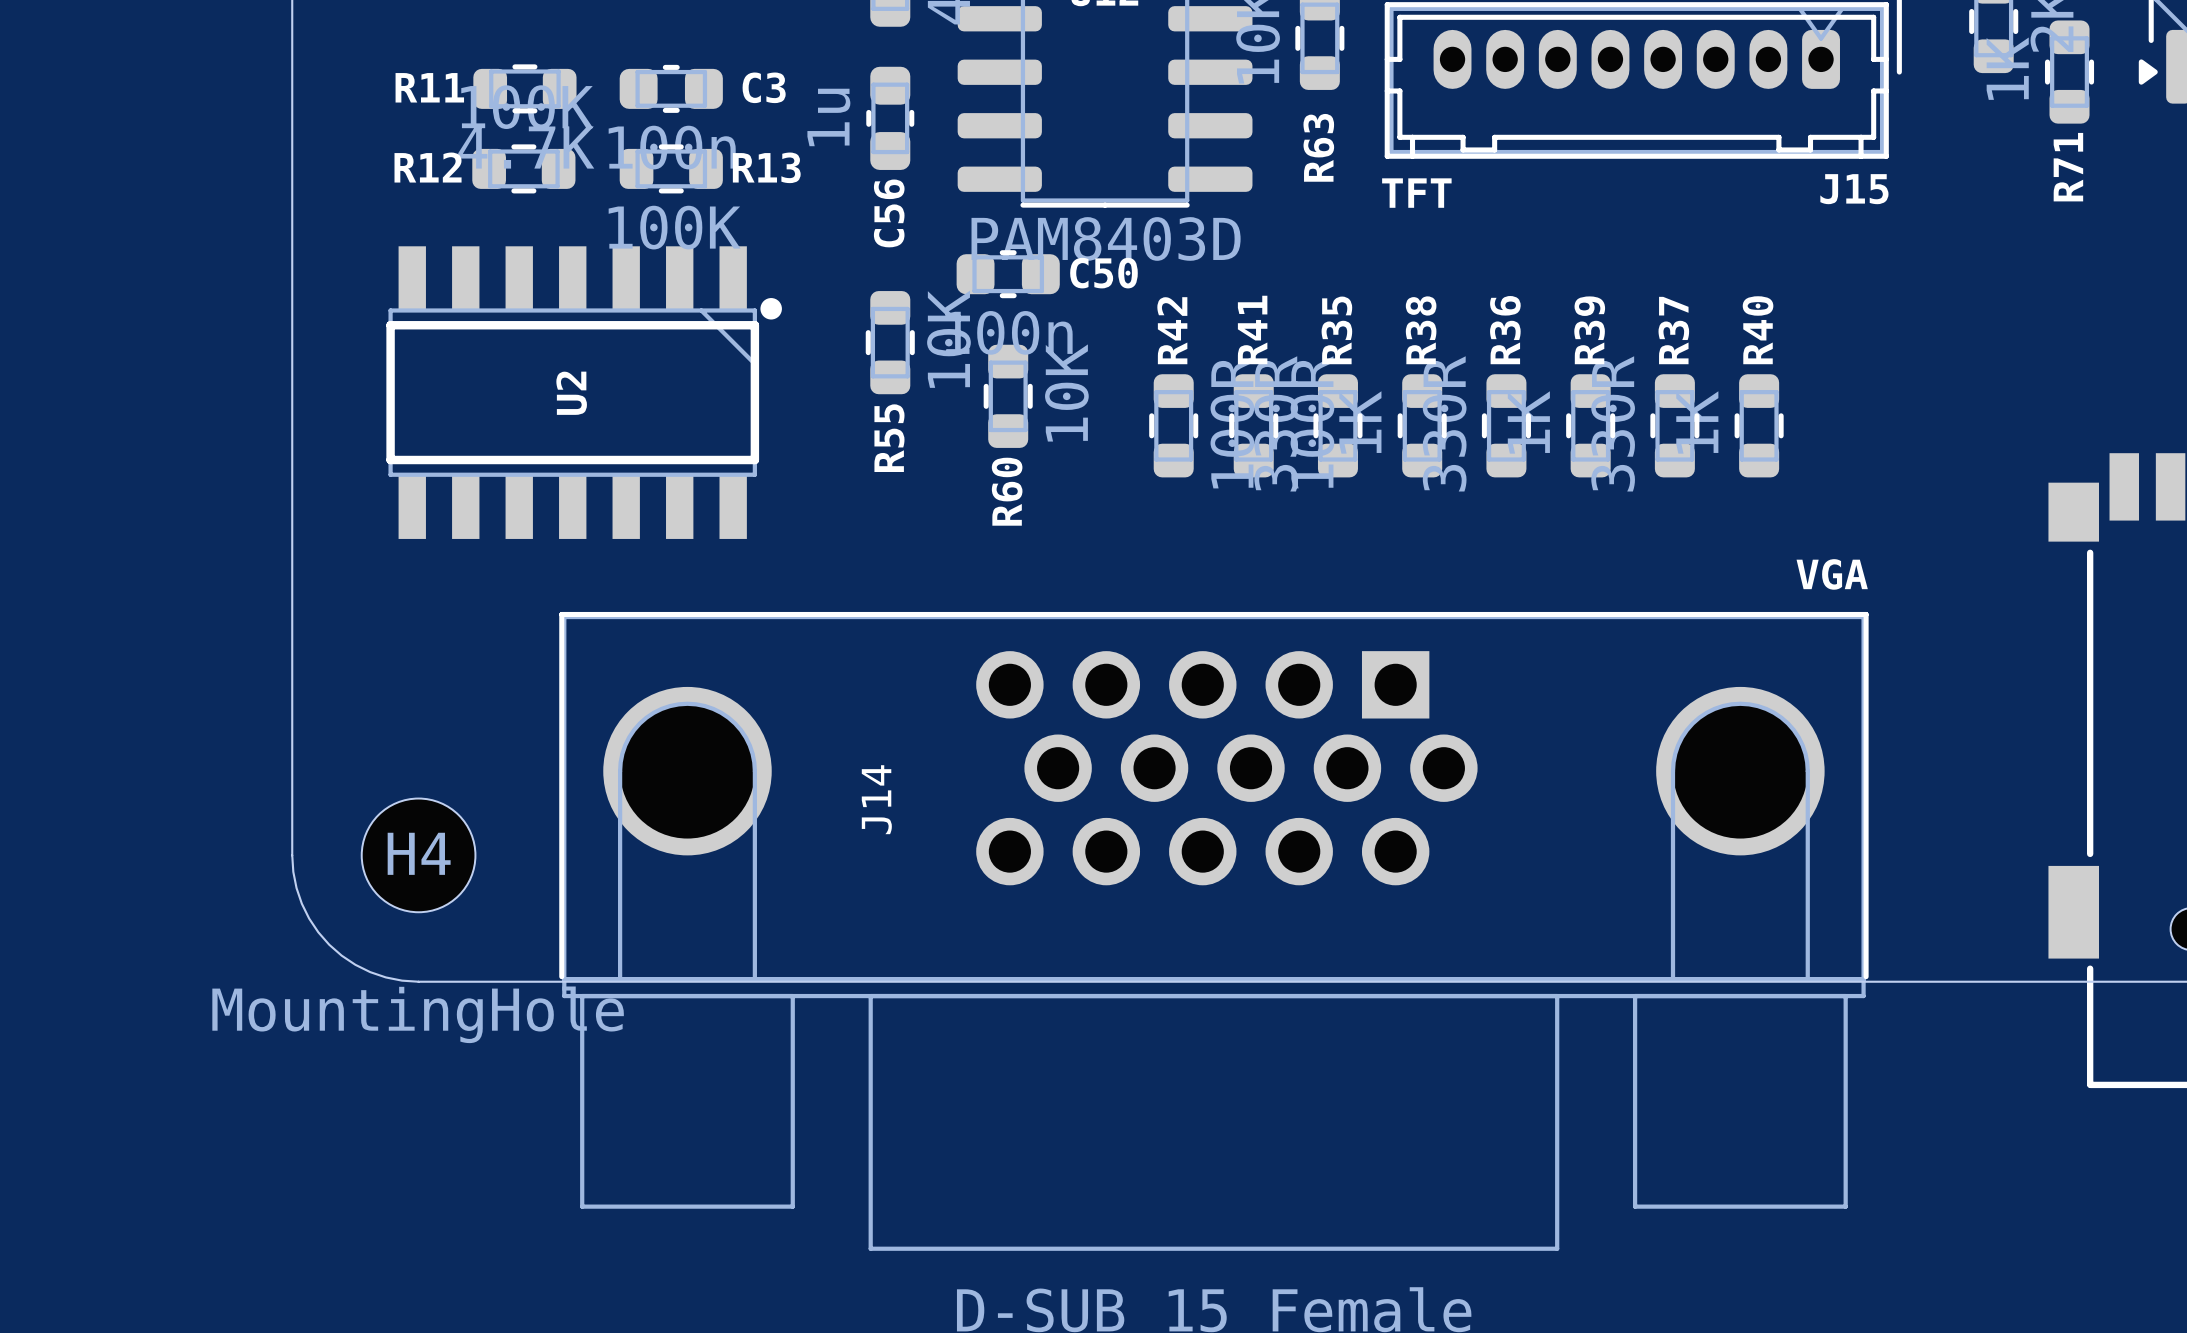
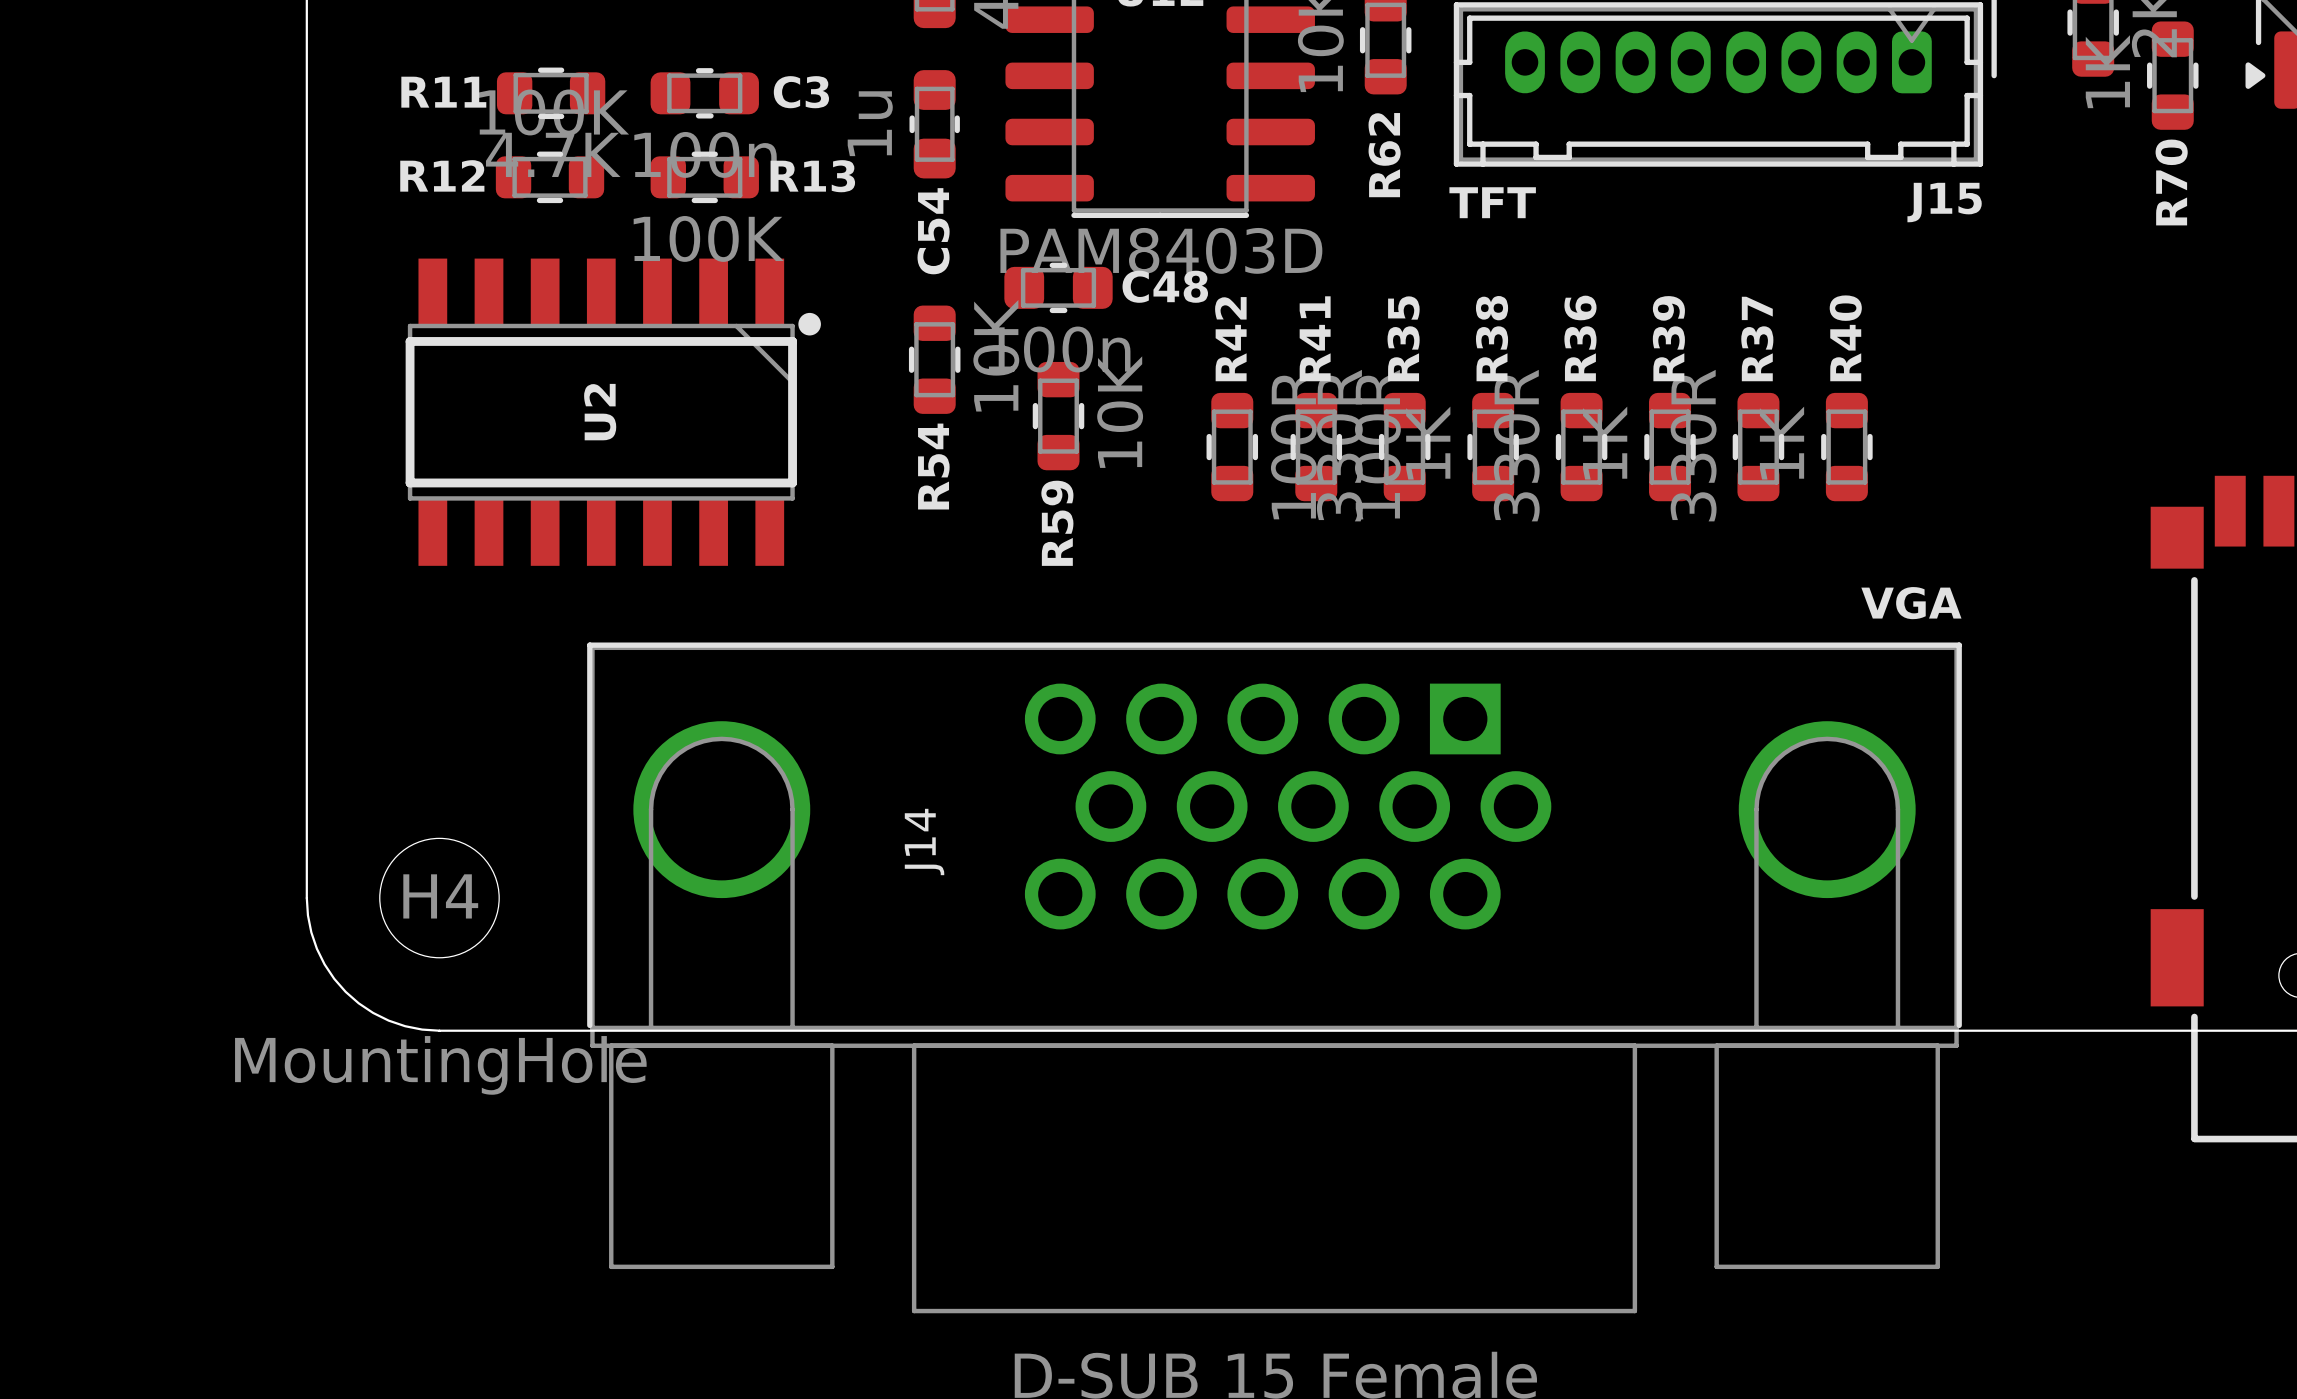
R63 name: R63 (1318, 147) -> R62 (1384, 155)
R71 name: R71 (2068, 167) -> R70 (2171, 182)
C56 name: C56 (889, 213) -> C54 (933, 231)
C50 name: C50 (1103, 273) -> C48 (1165, 286)
R55 name: R55 (889, 438) -> R54 (933, 466)
R60 name: R60 (1007, 491) -> R59 (1057, 523)

